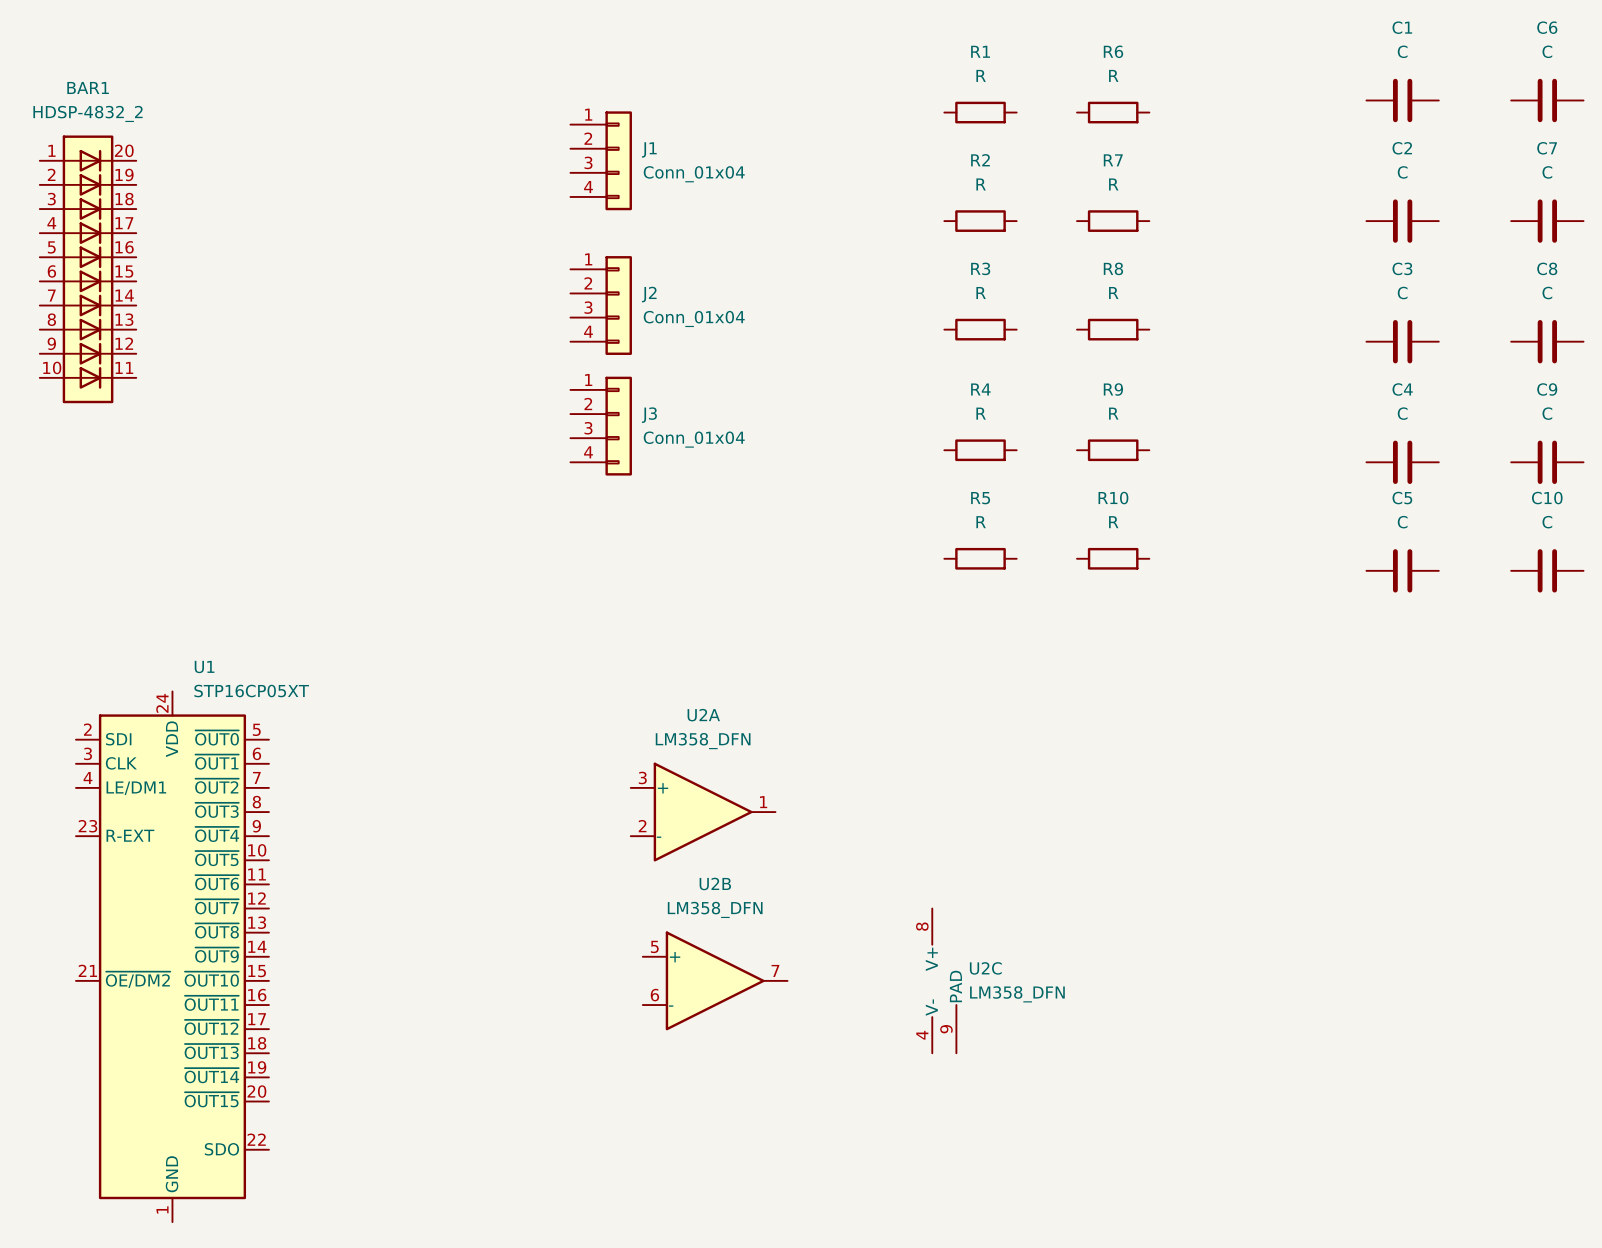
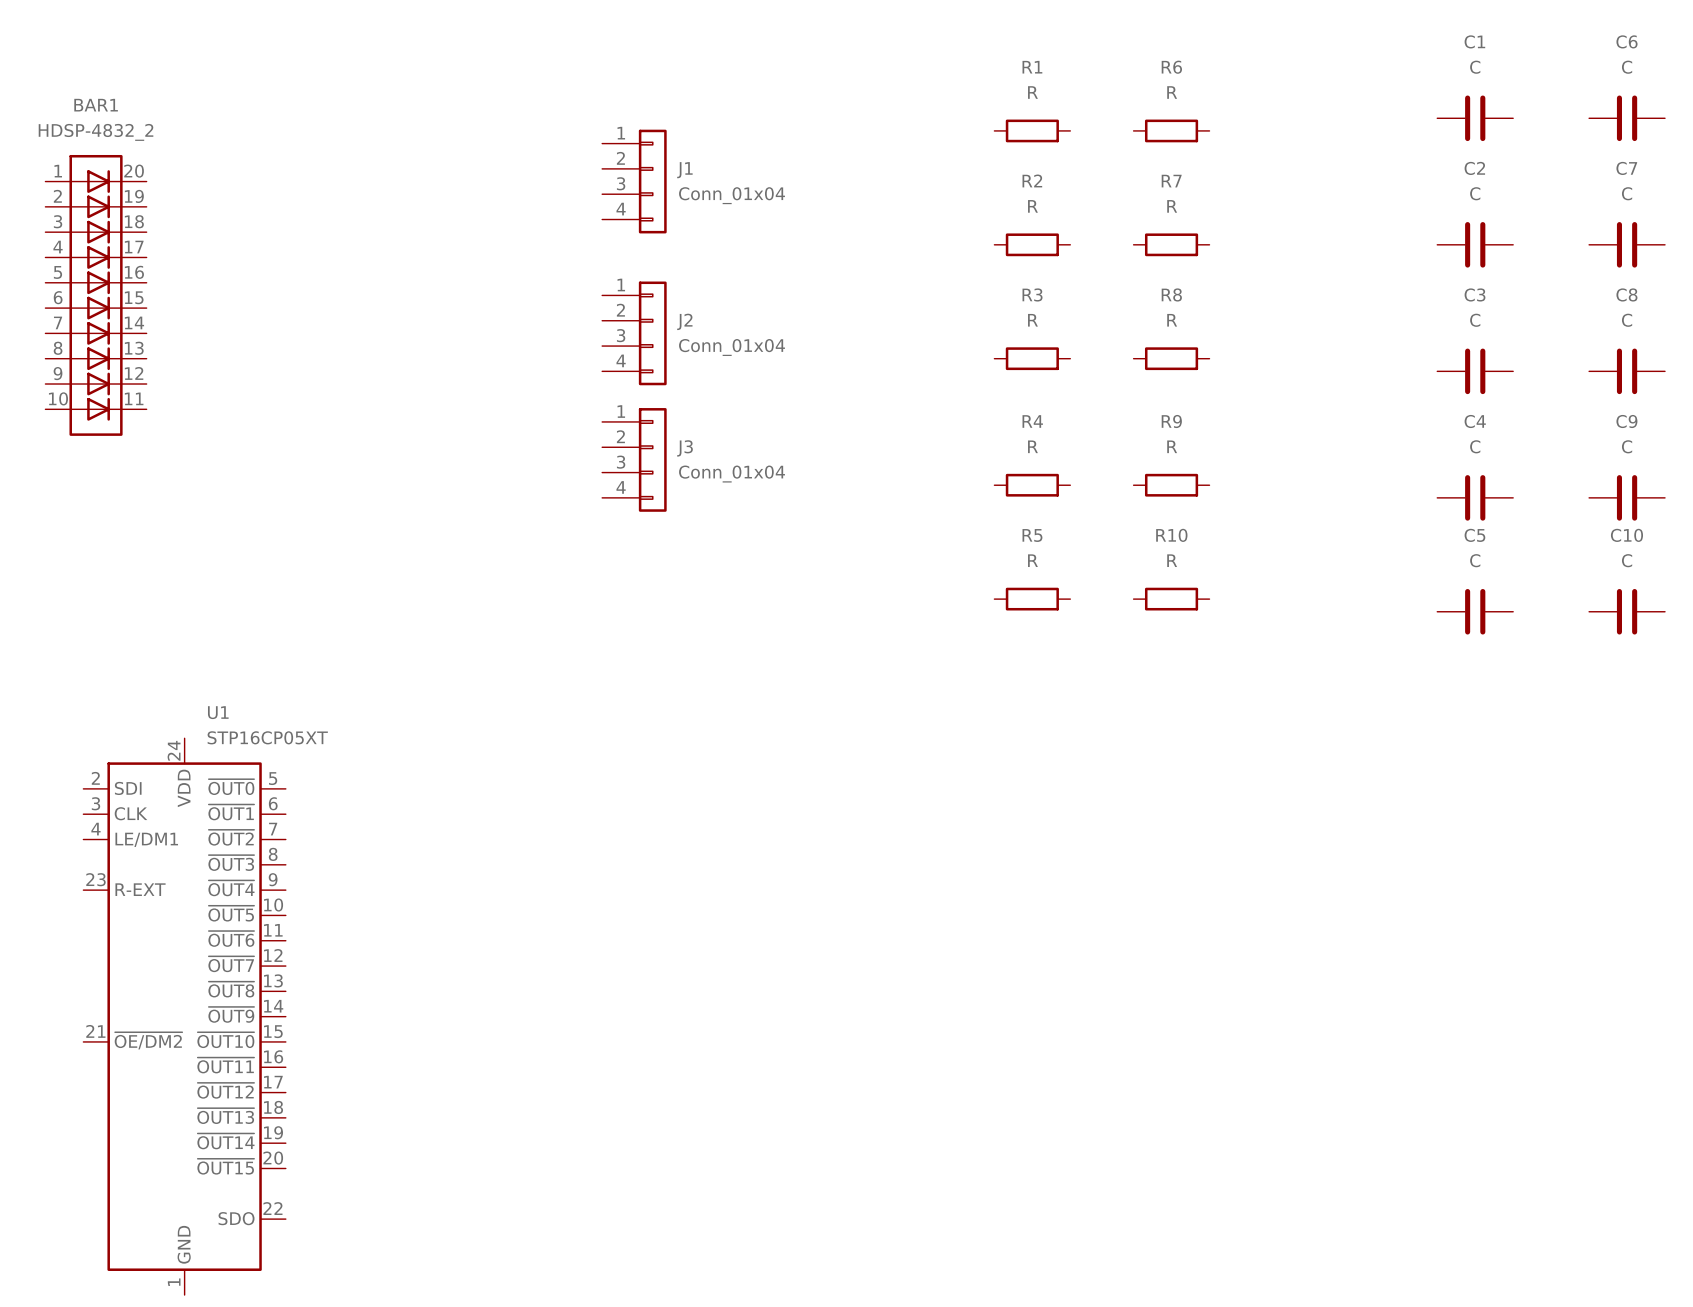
U2A: LM358_DFN (703, 812) -> none
U2B: LM358_DFN (715, 980) -> none
U2C: LM358_DFN (944, 980) -> none

